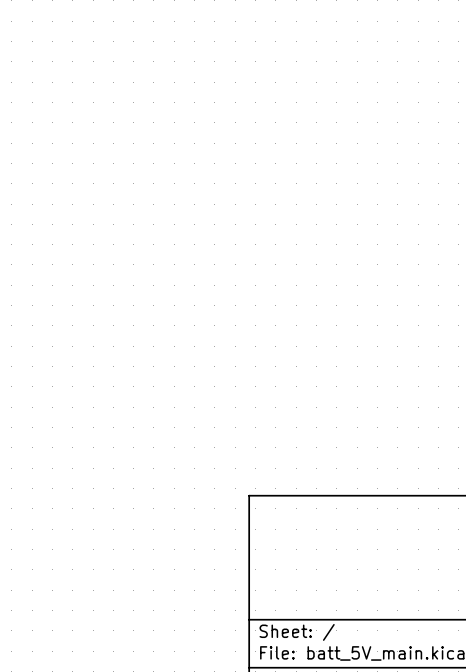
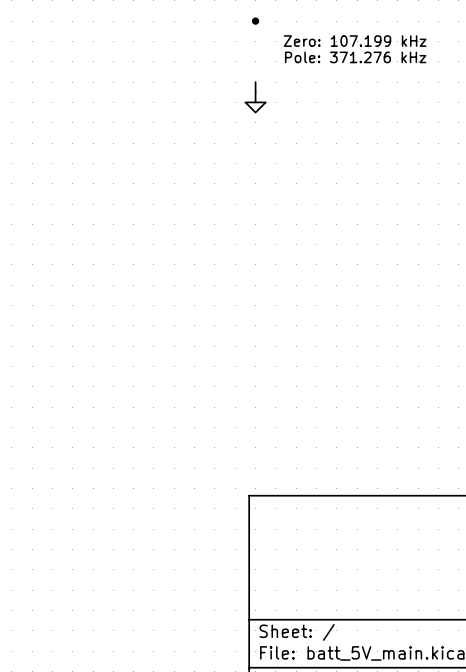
junction: none -> (255, 21)
text: none -> Zero: 107.199 kHz (355, 41)
text: none -> Pole: 371.276 kHz (355, 57)
wire: none -> (255, 82) (255, 92)
power symbol: none -> (255, 102)

